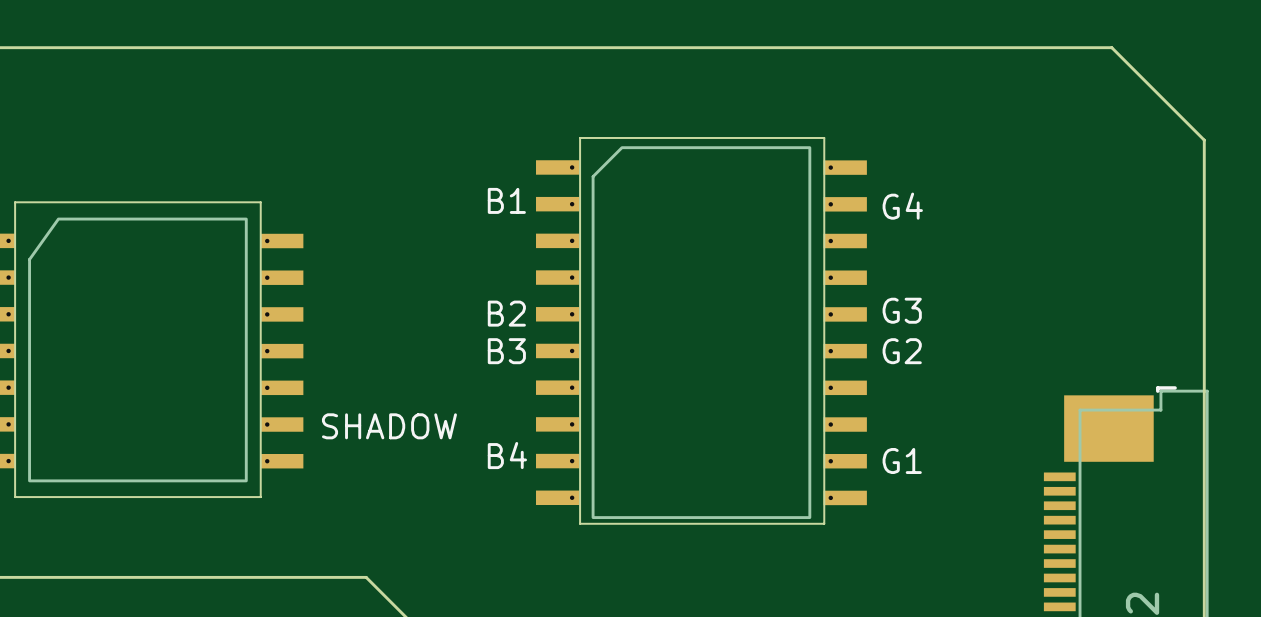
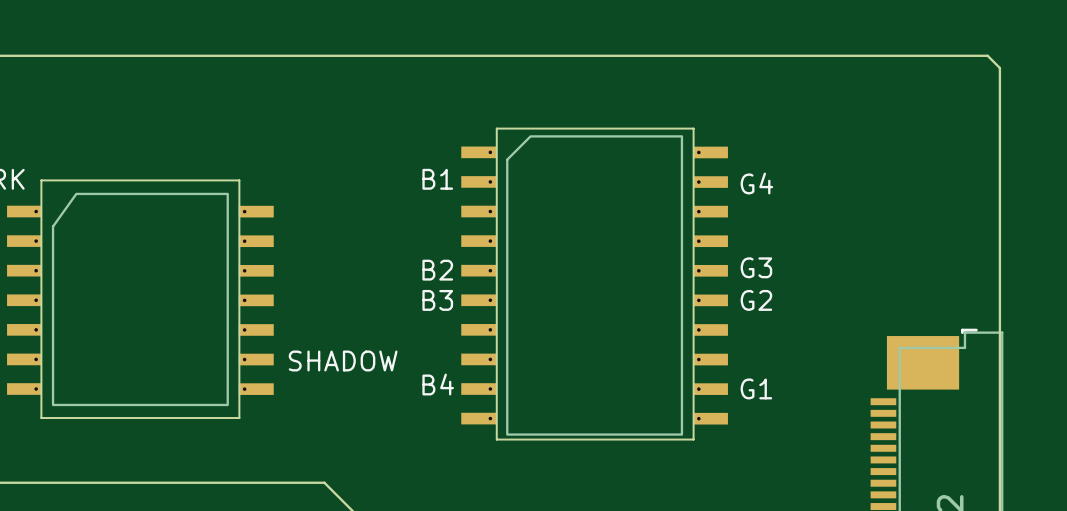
board edge: (1111, 47) (1204, 140) -> (925, 55) (987, 55) (999, 68) (999, 130)

